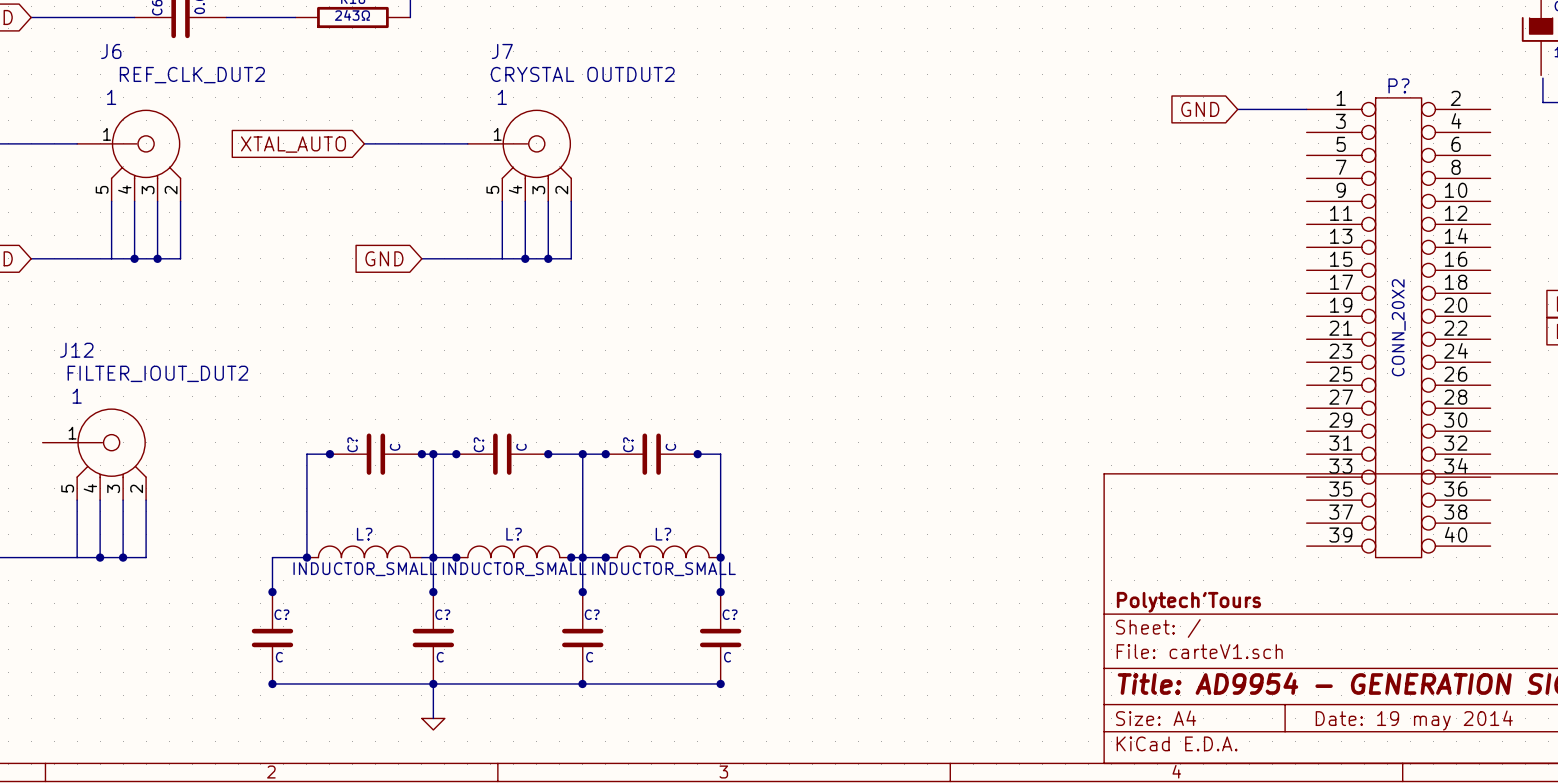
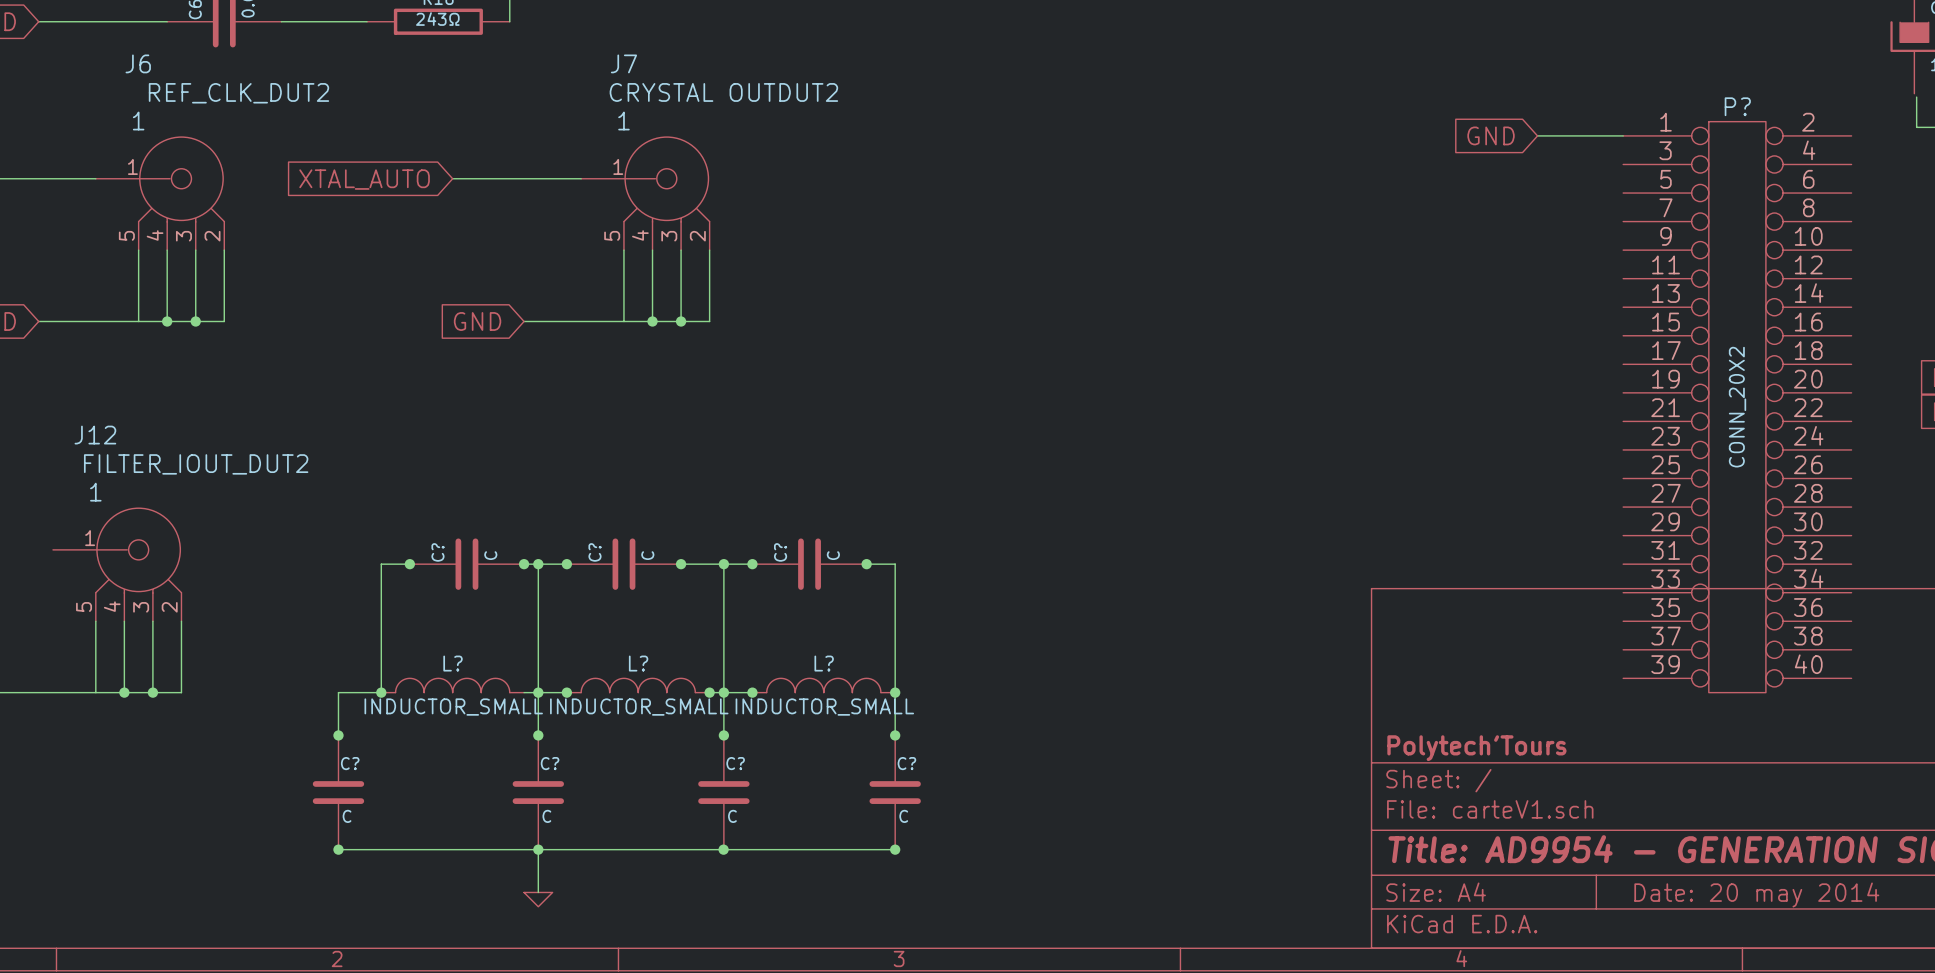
title block: Date: 19 may 2014 (1414, 720) -> Date: 20 may 2014 (1756, 895)

